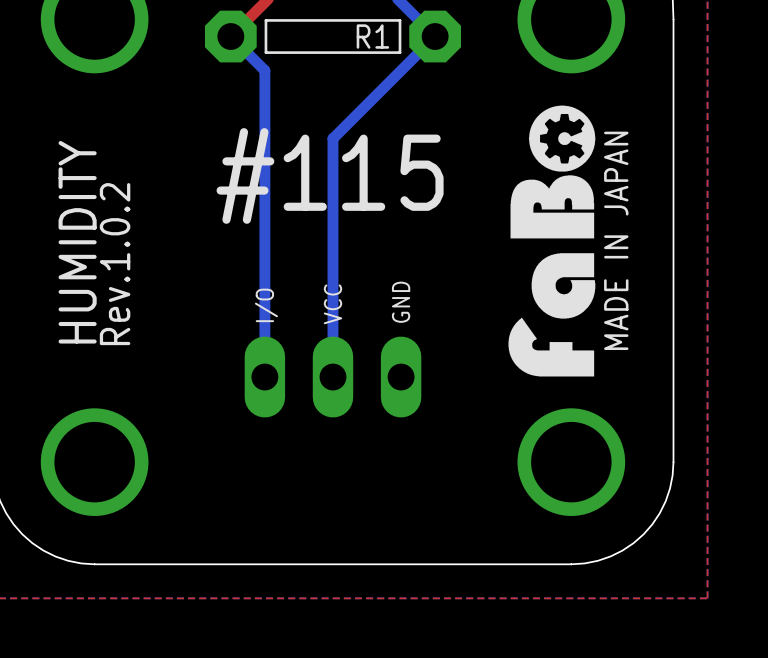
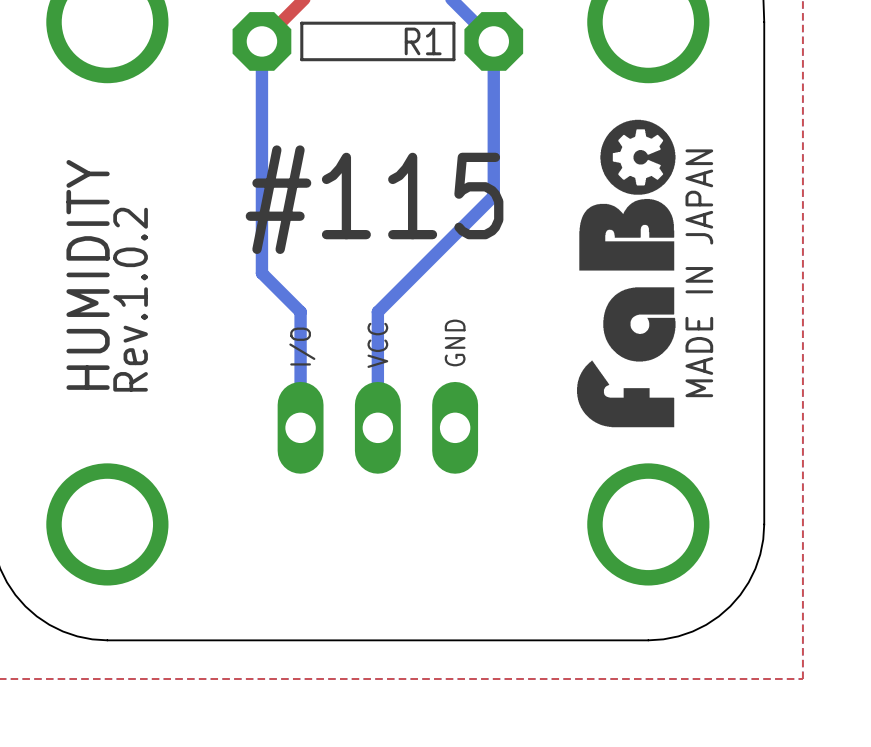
bottom track: (230, 36) (264, 70) (264, 274) -> (261, 41) (261, 273) (300, 311)
bottom track: (435, 36) (332, 138) (332, 274) -> (493, 41) (493, 196) (377, 311)

